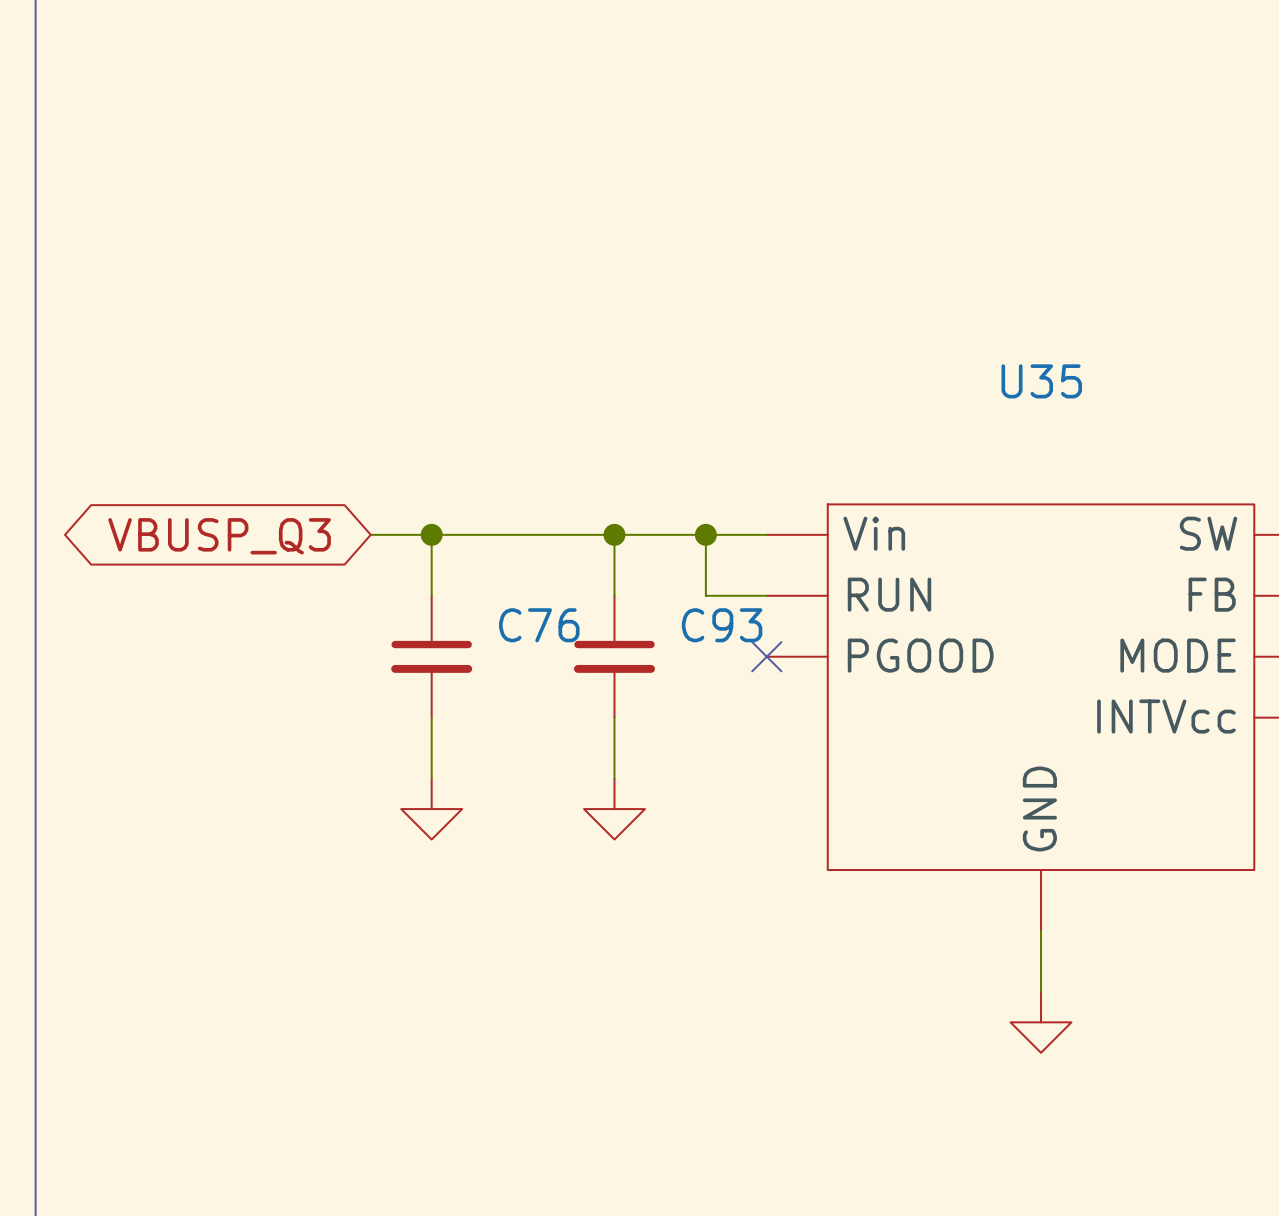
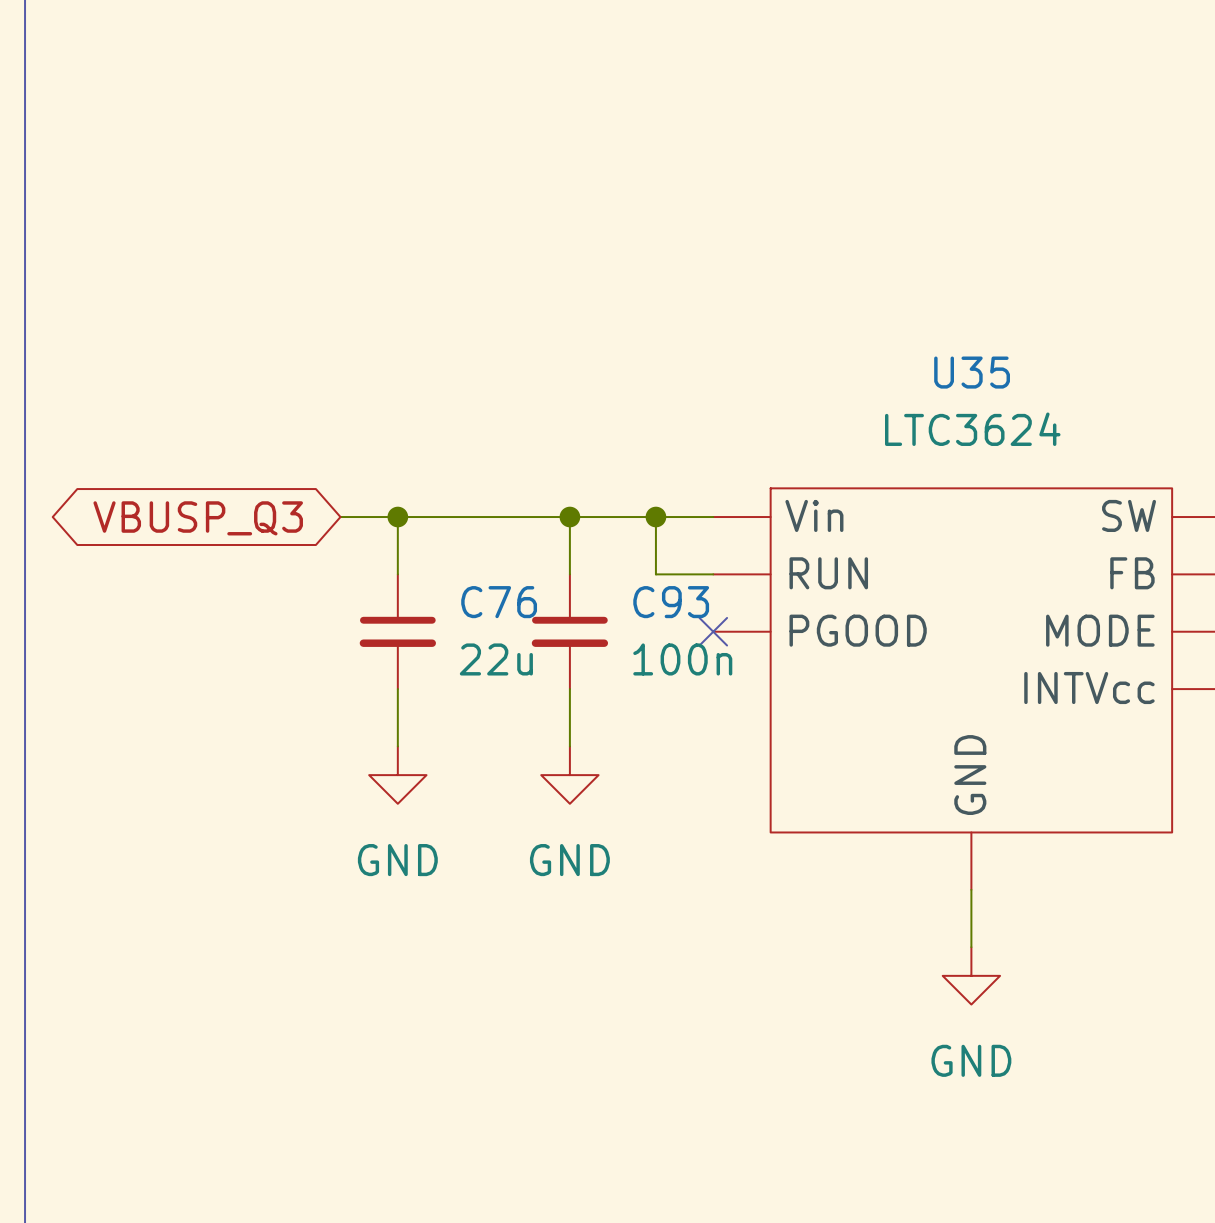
U35 value: none -> LTC3624 (972, 429)
C76 value: none -> 22u (496, 659)
C93 value: none -> 100n (682, 659)
power symbol text: none -> GND (397, 860)
power symbol text: none -> GND (569, 860)
power symbol text: none -> GND (971, 1060)

